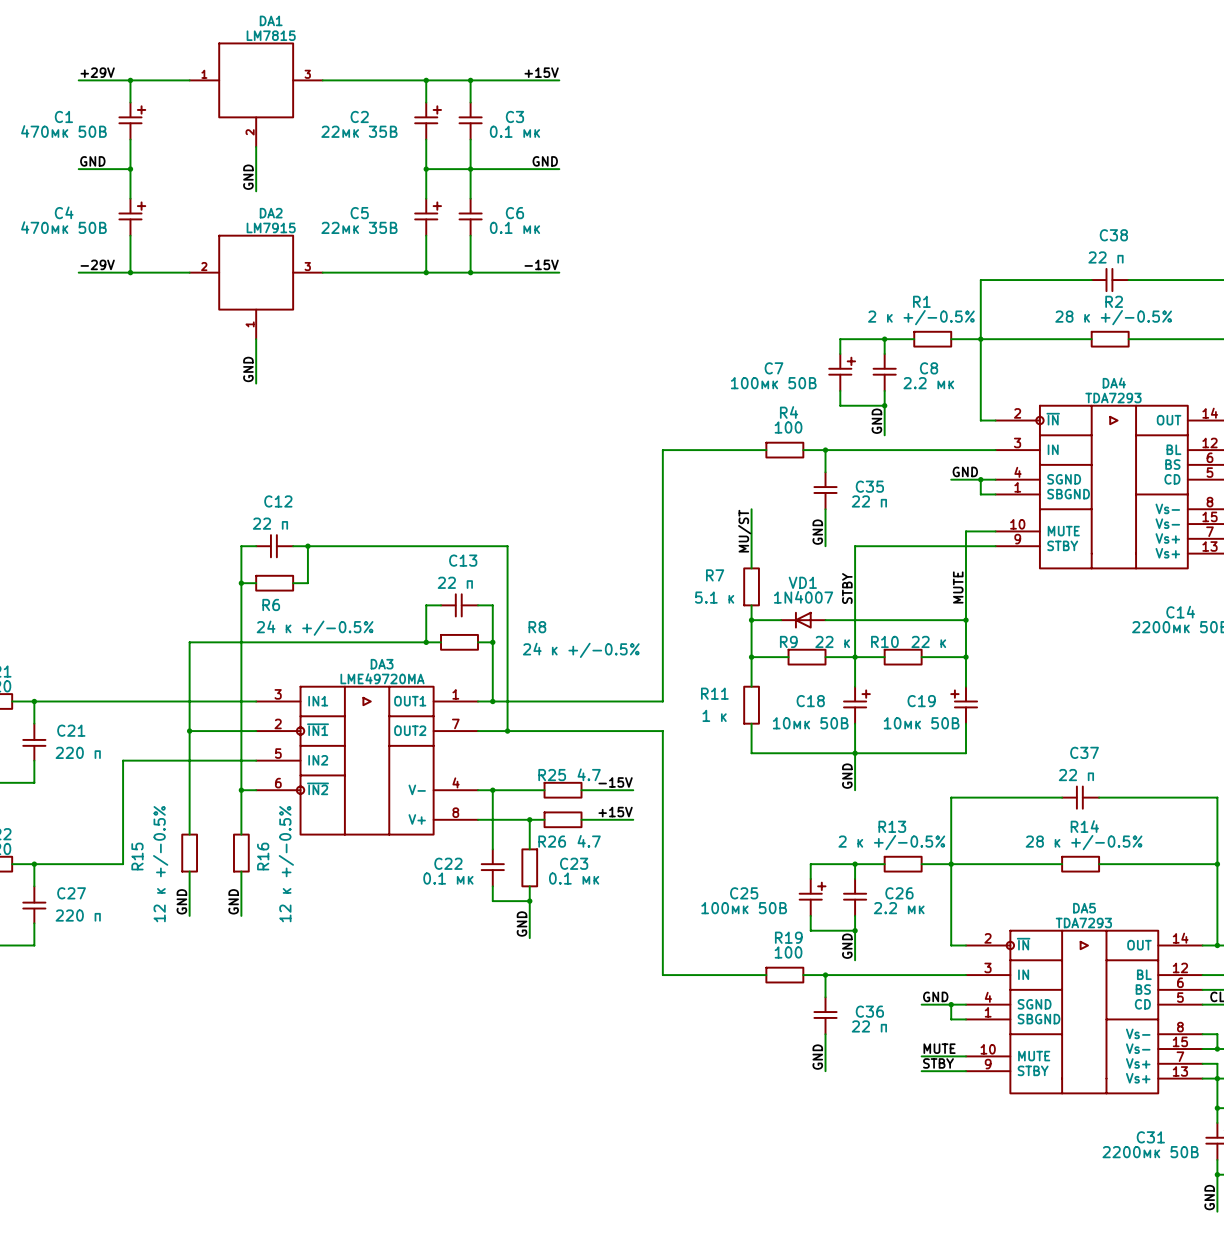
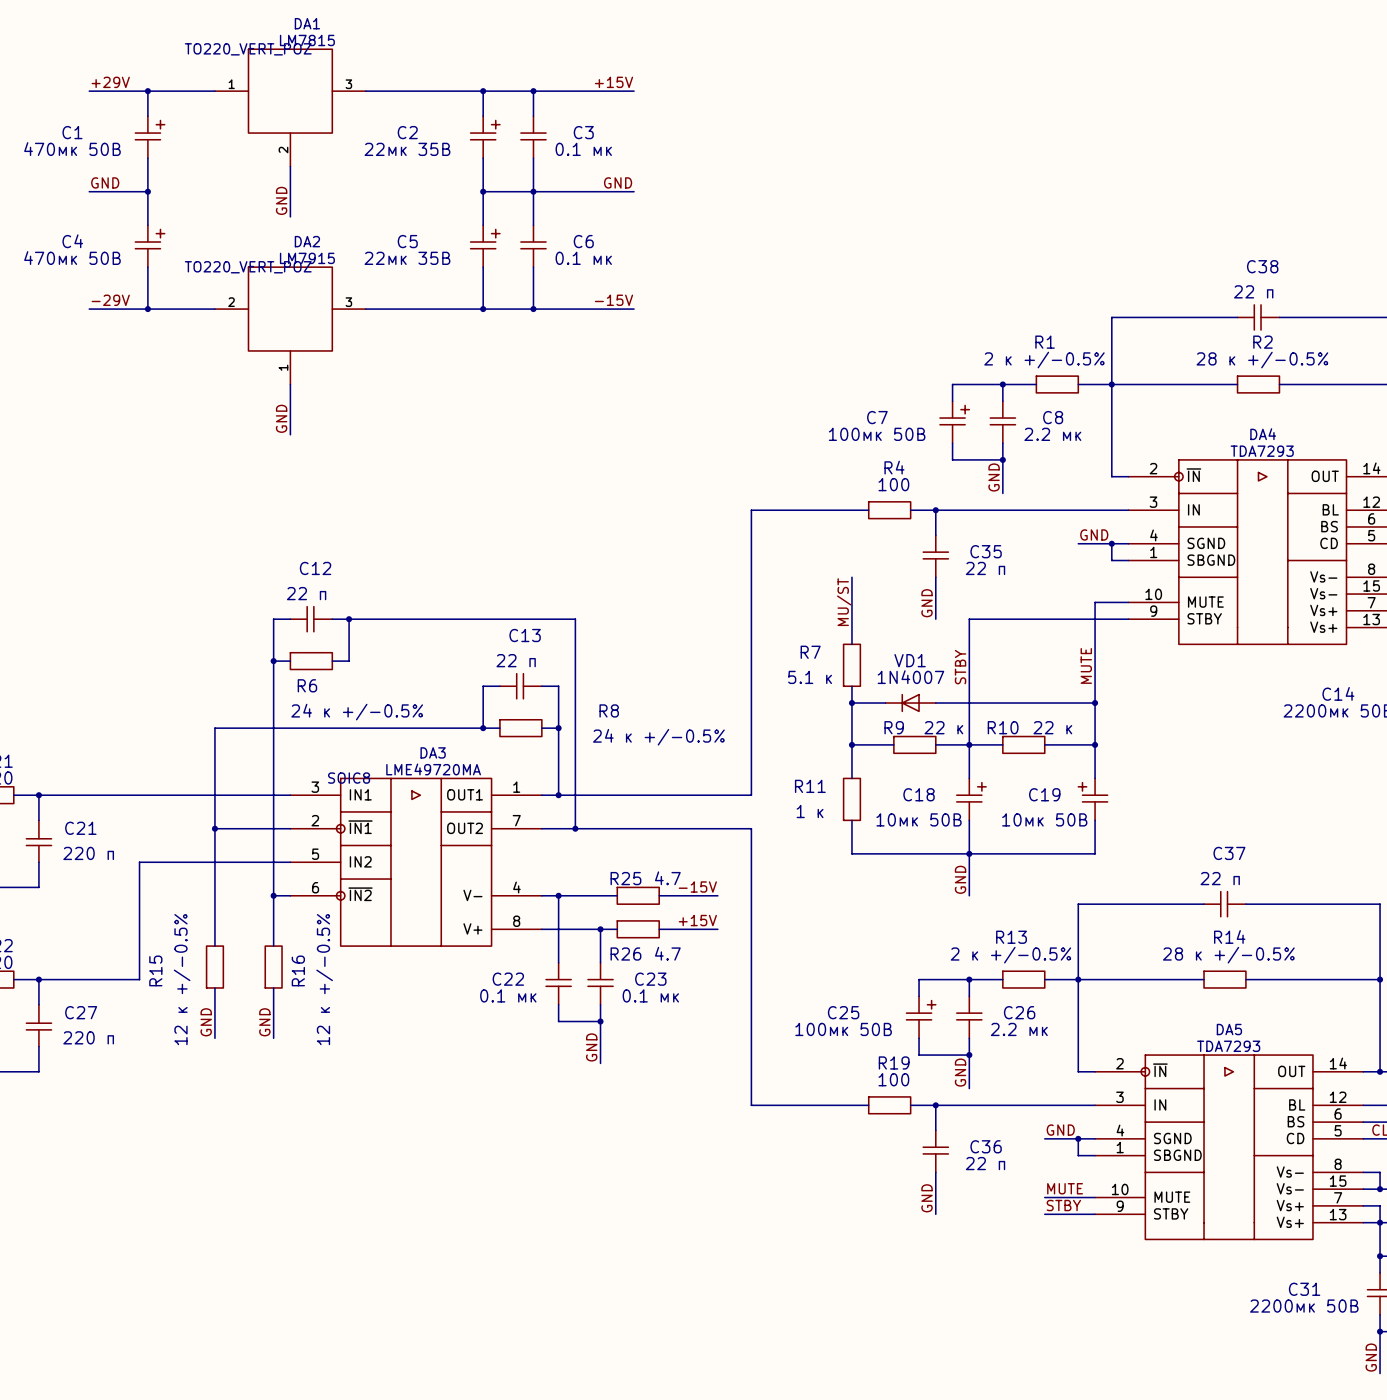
DA1 text: none -> TO220_VERT_POZ (248, 49)
DA2 text: none -> TO220_VERT_POZ (248, 267)
DA3 text: none -> SOIC8 (349, 778)
C23 symbol: [522, 849, 538, 887] -> [587, 962, 614, 1005]

